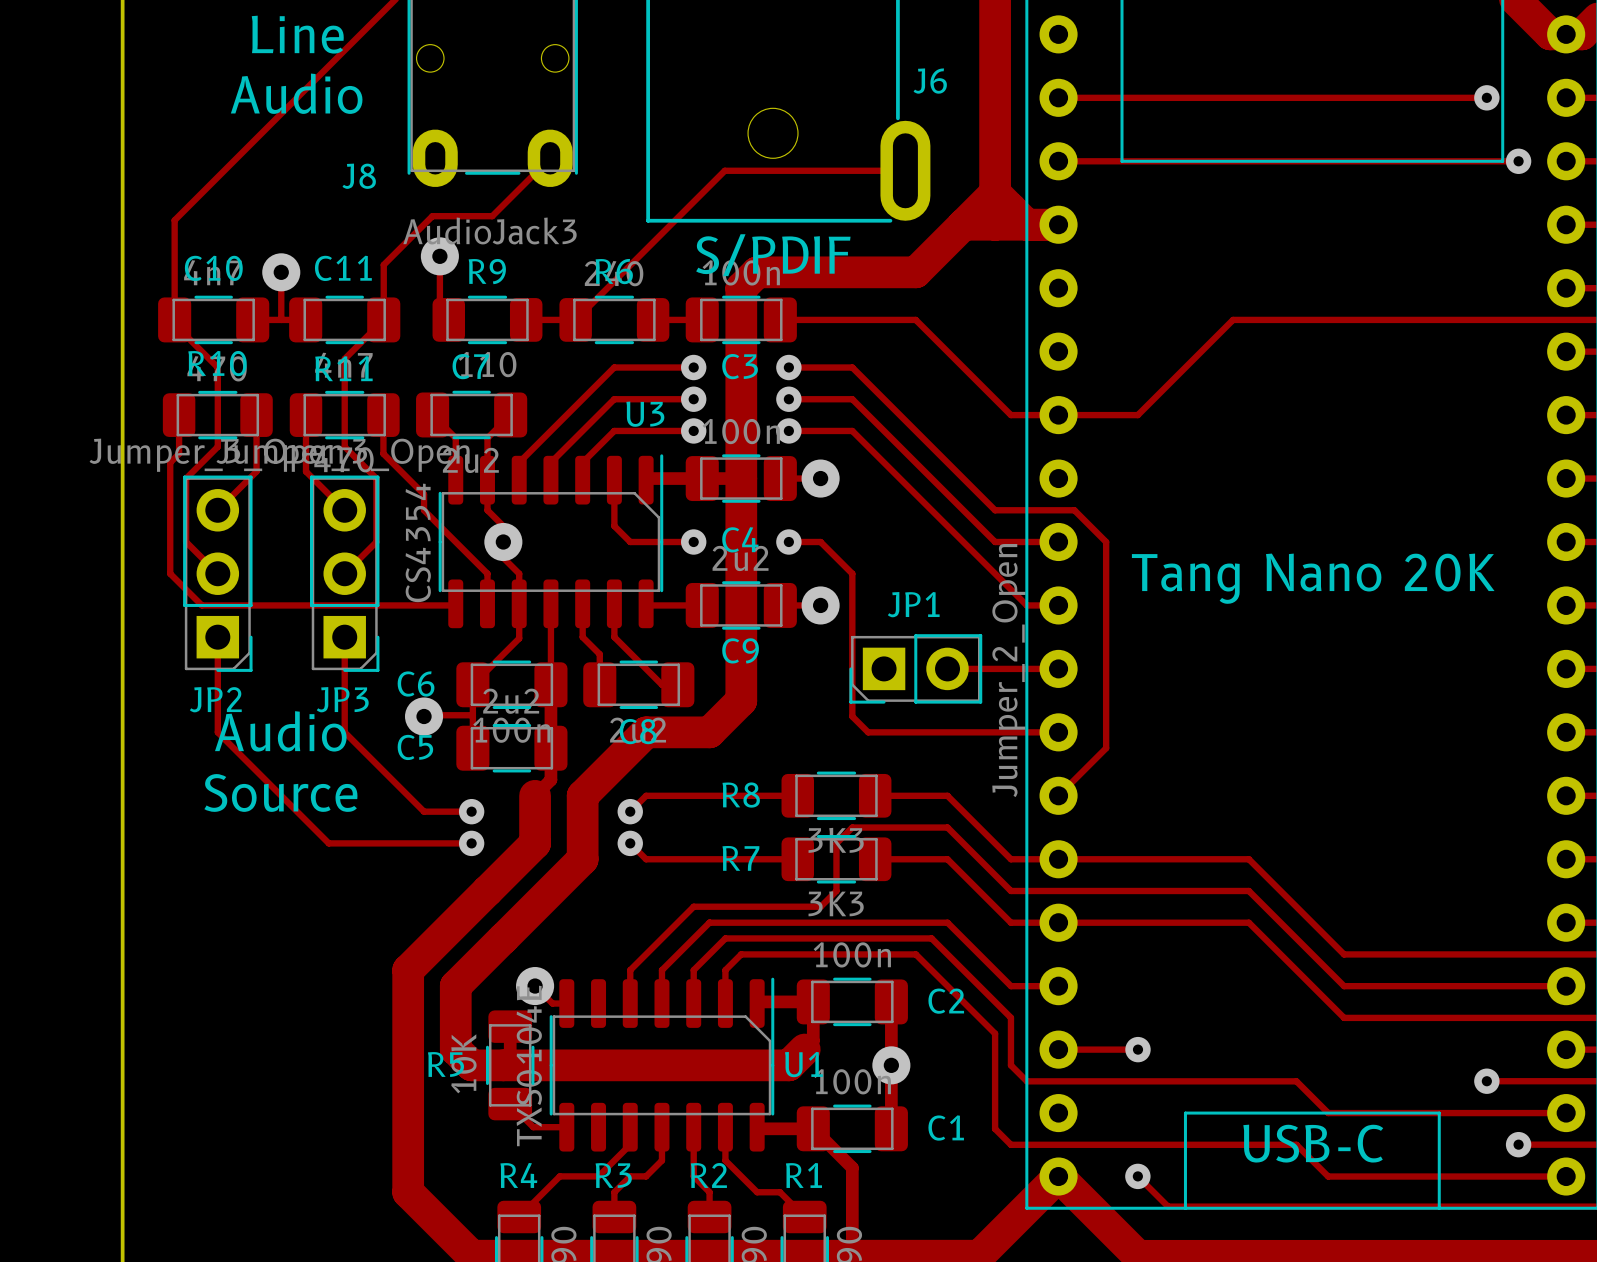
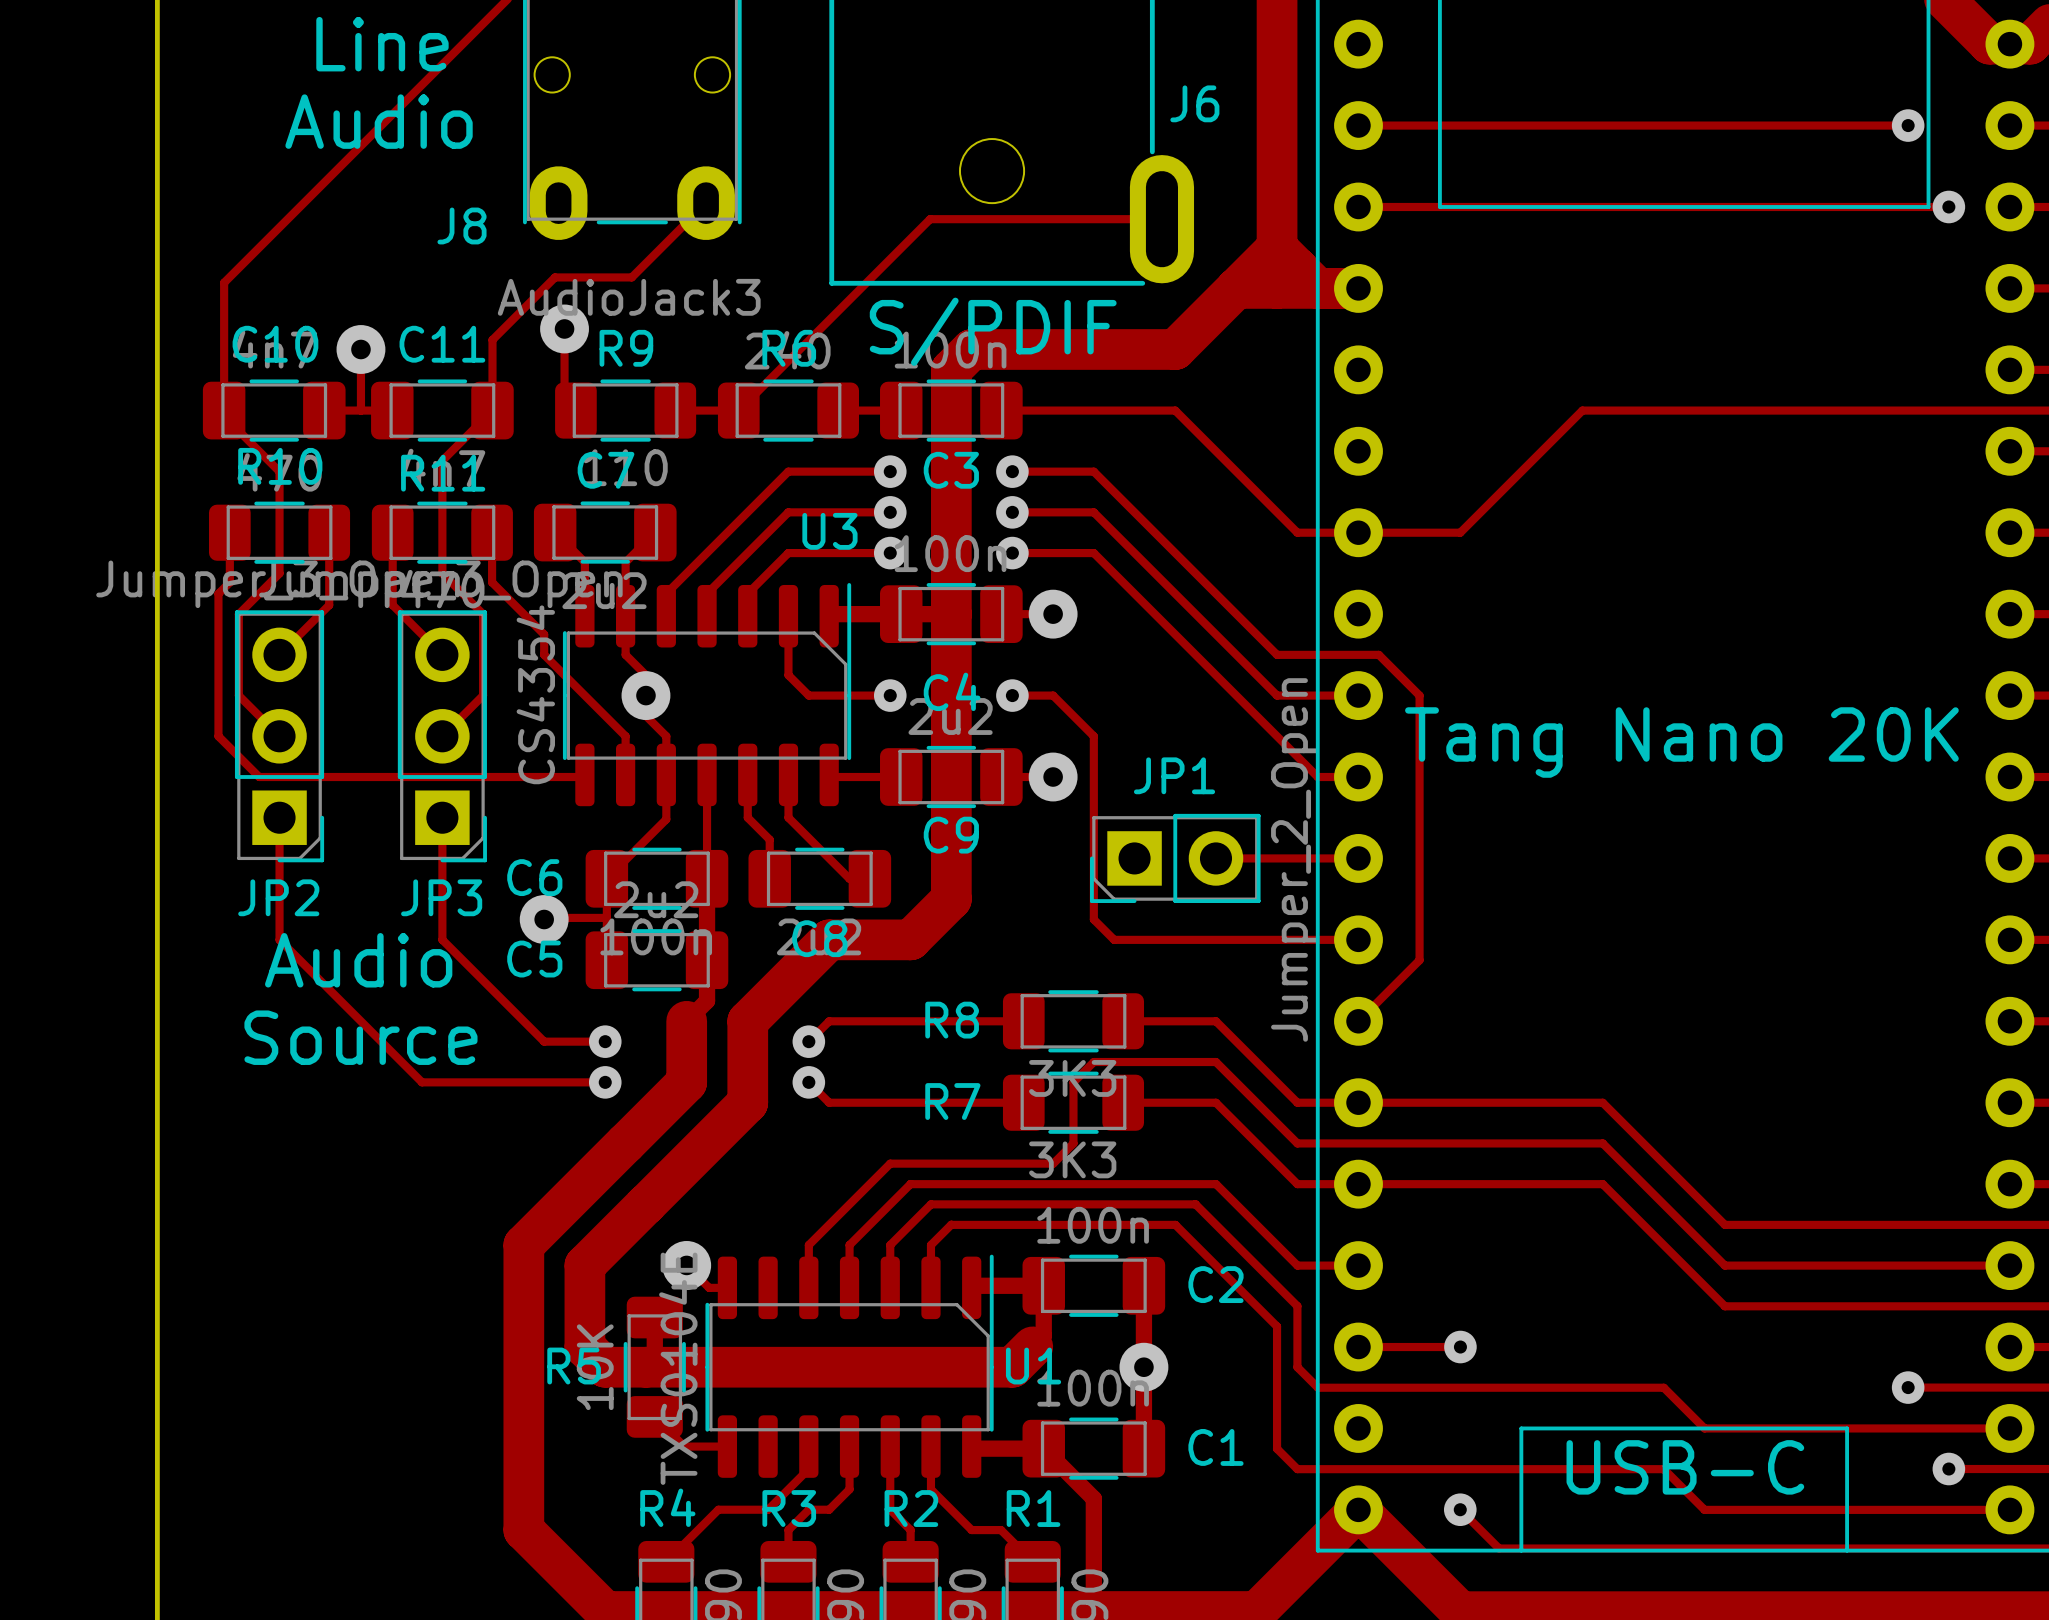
text position: Audio (280, 731) -> Audio (358, 960)
text position: Source (280, 792) -> Source (360, 1037)

